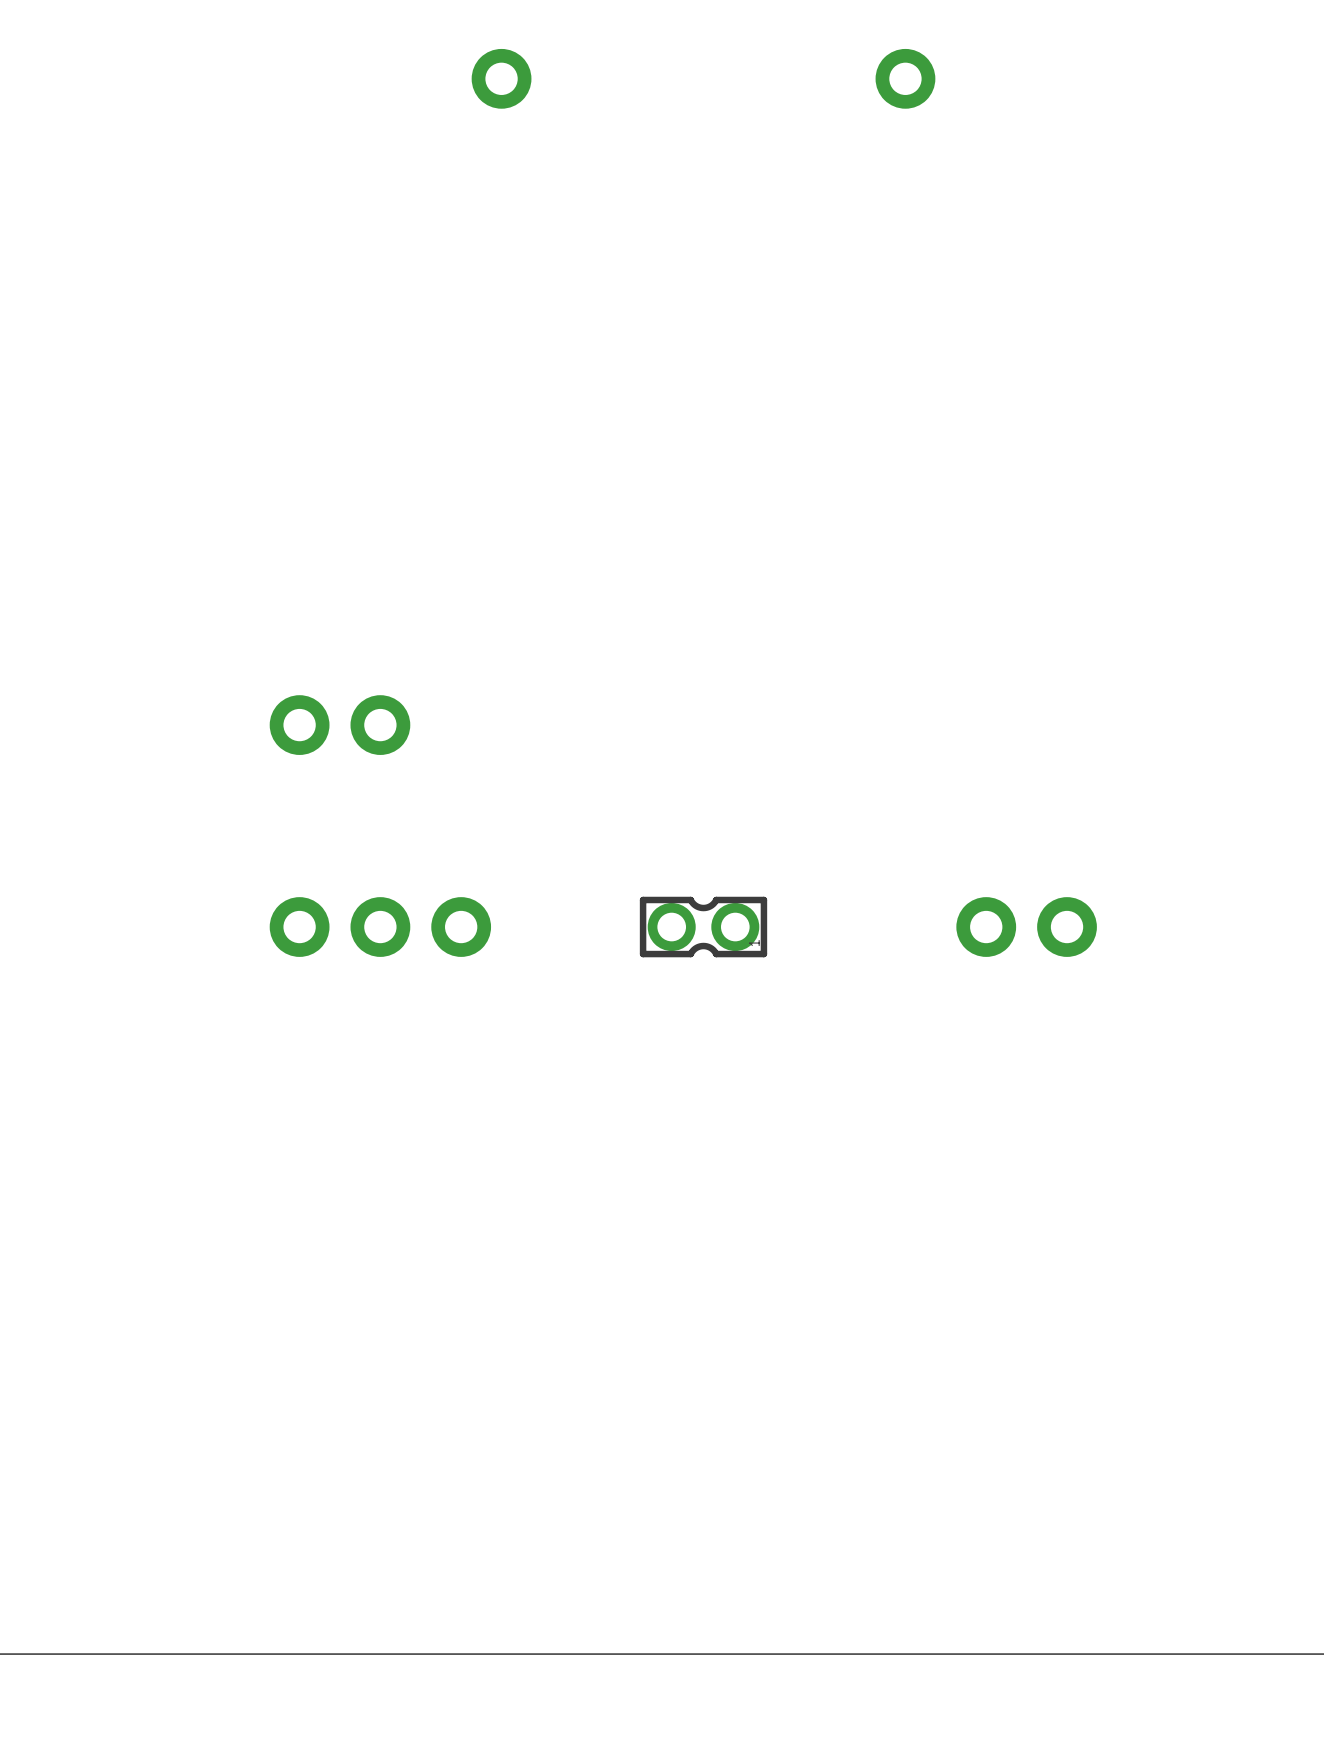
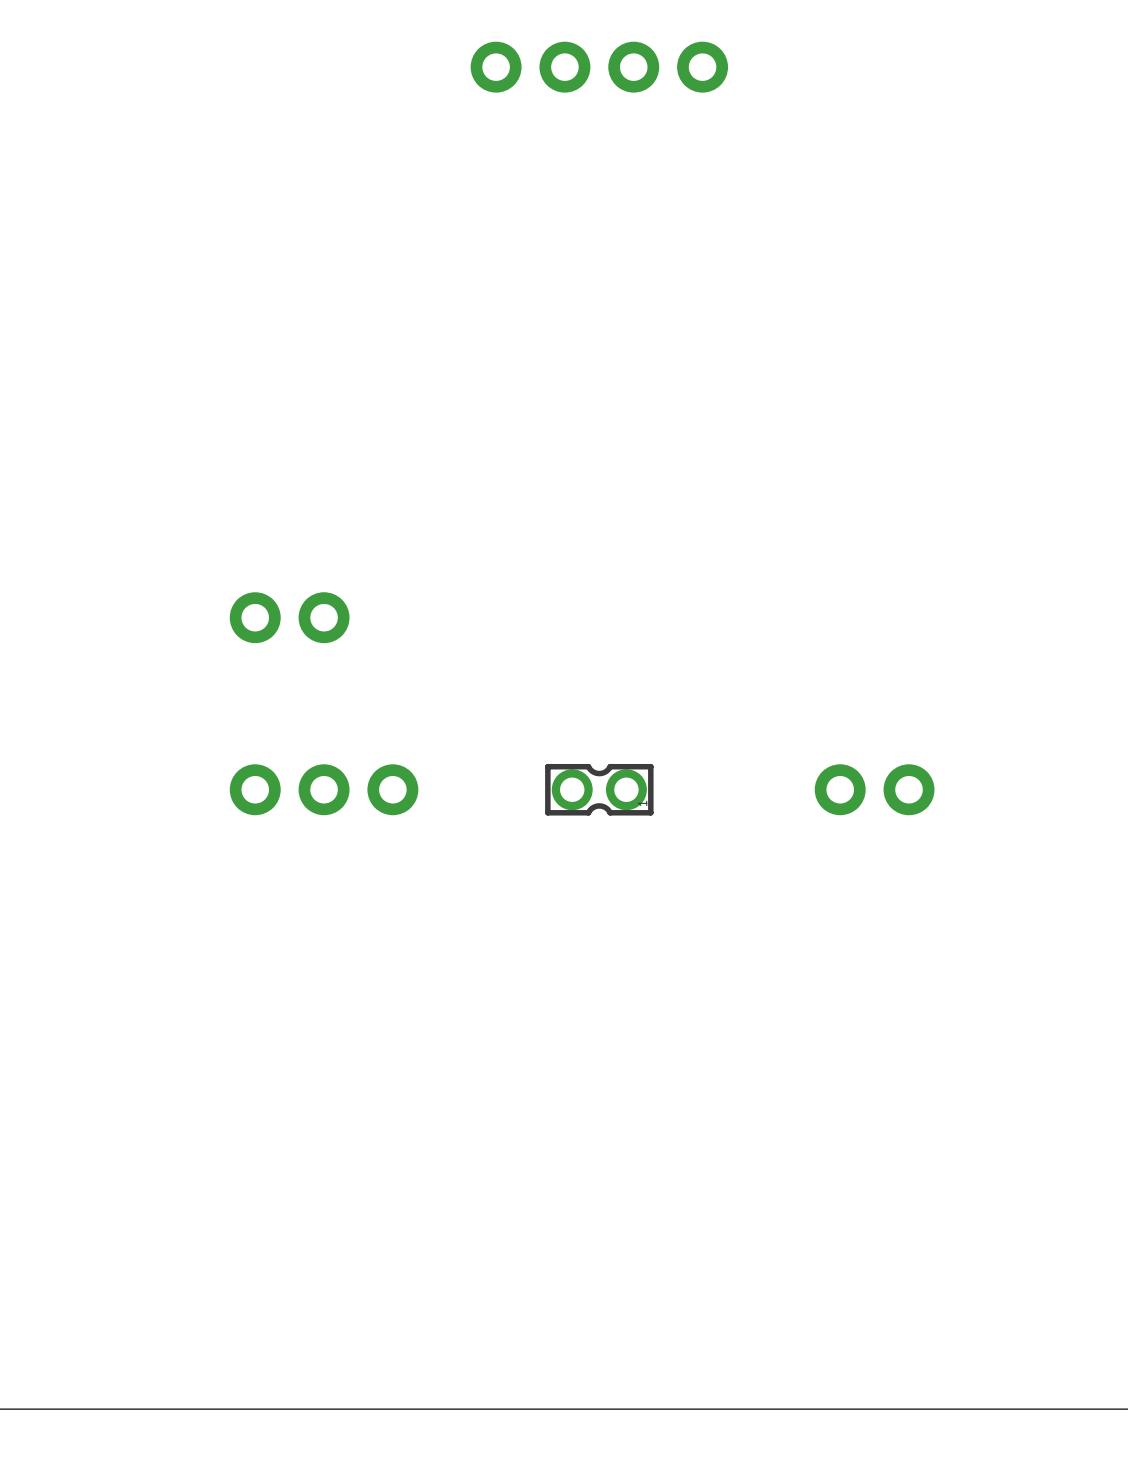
part: (501, 78) -> none
part: none -> (599, 67)
part: (905, 78) -> none

